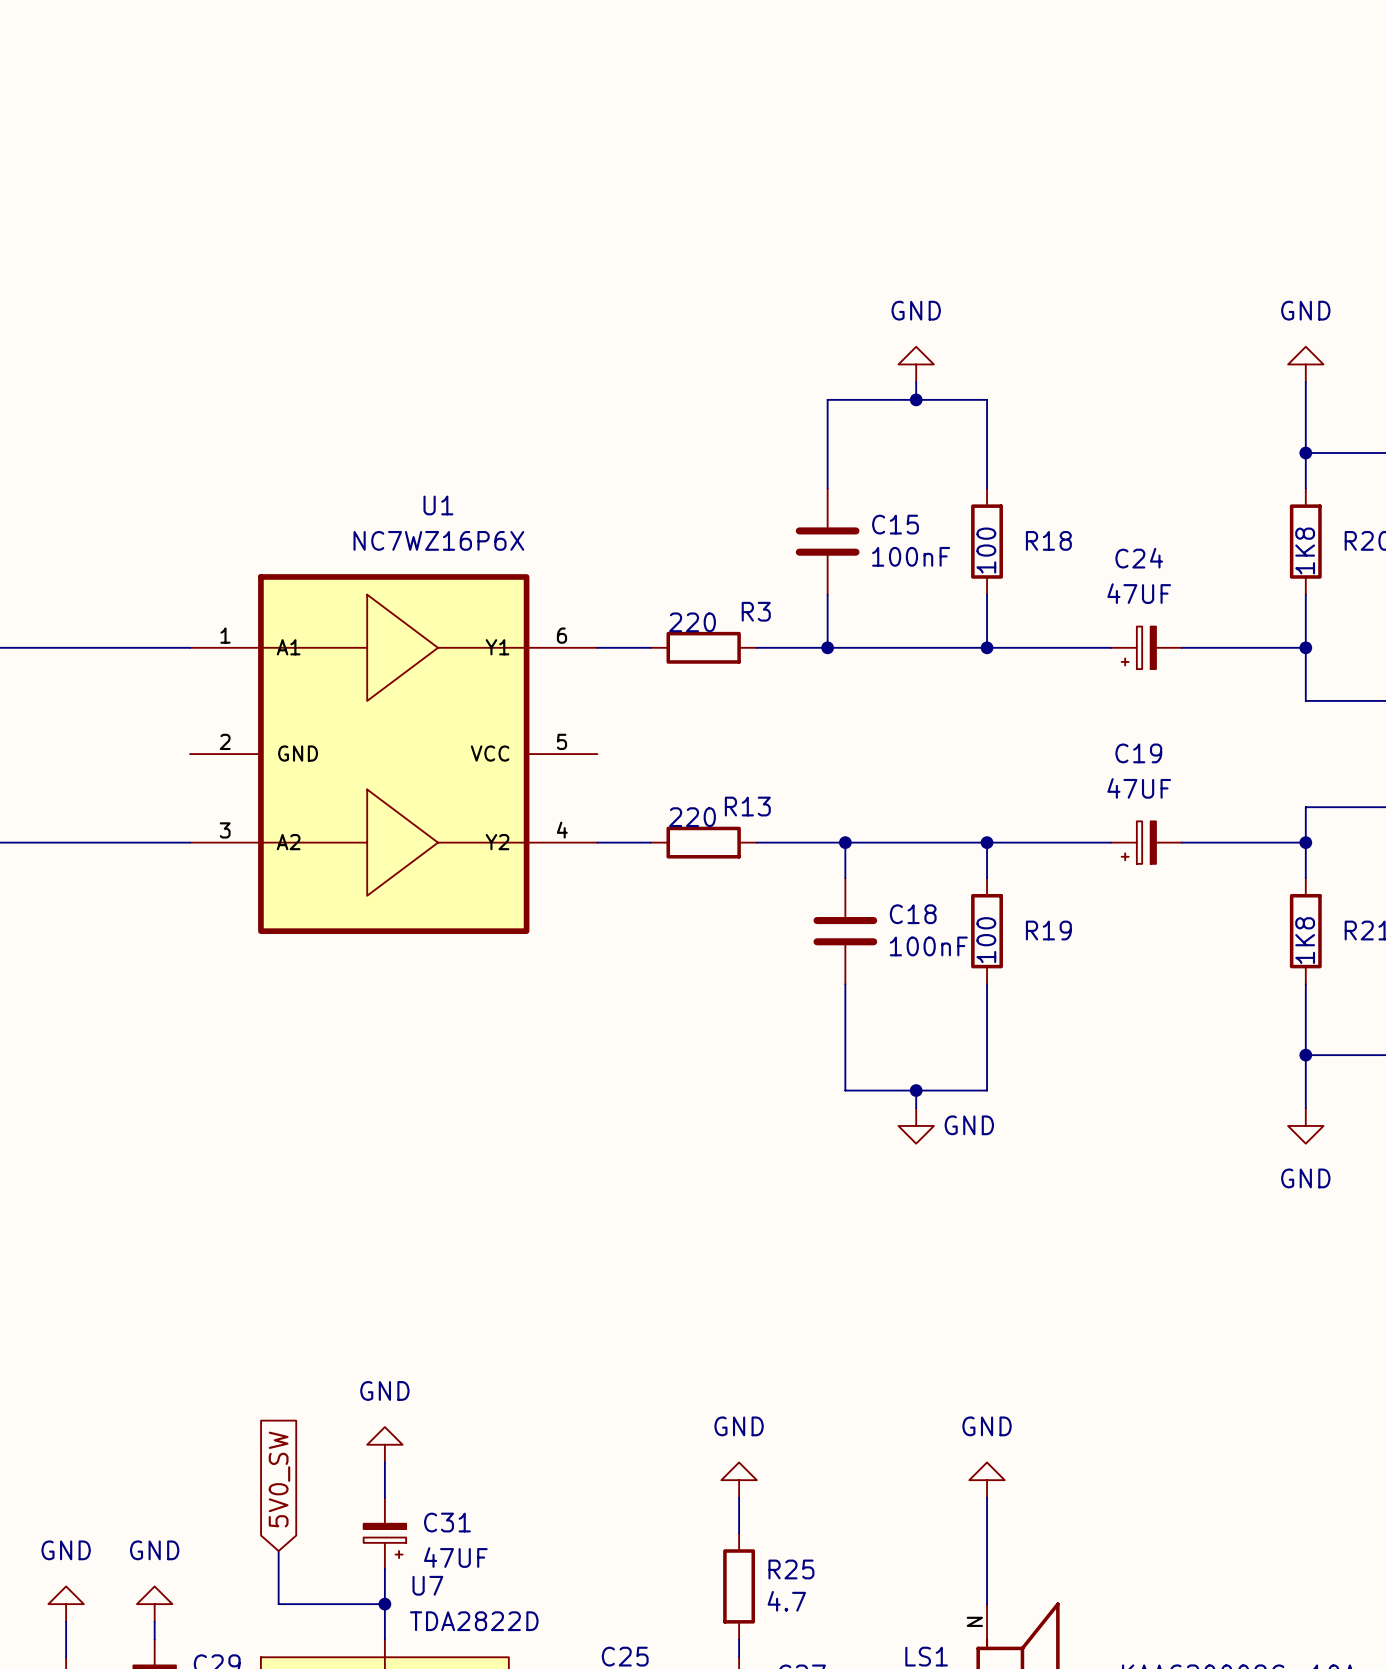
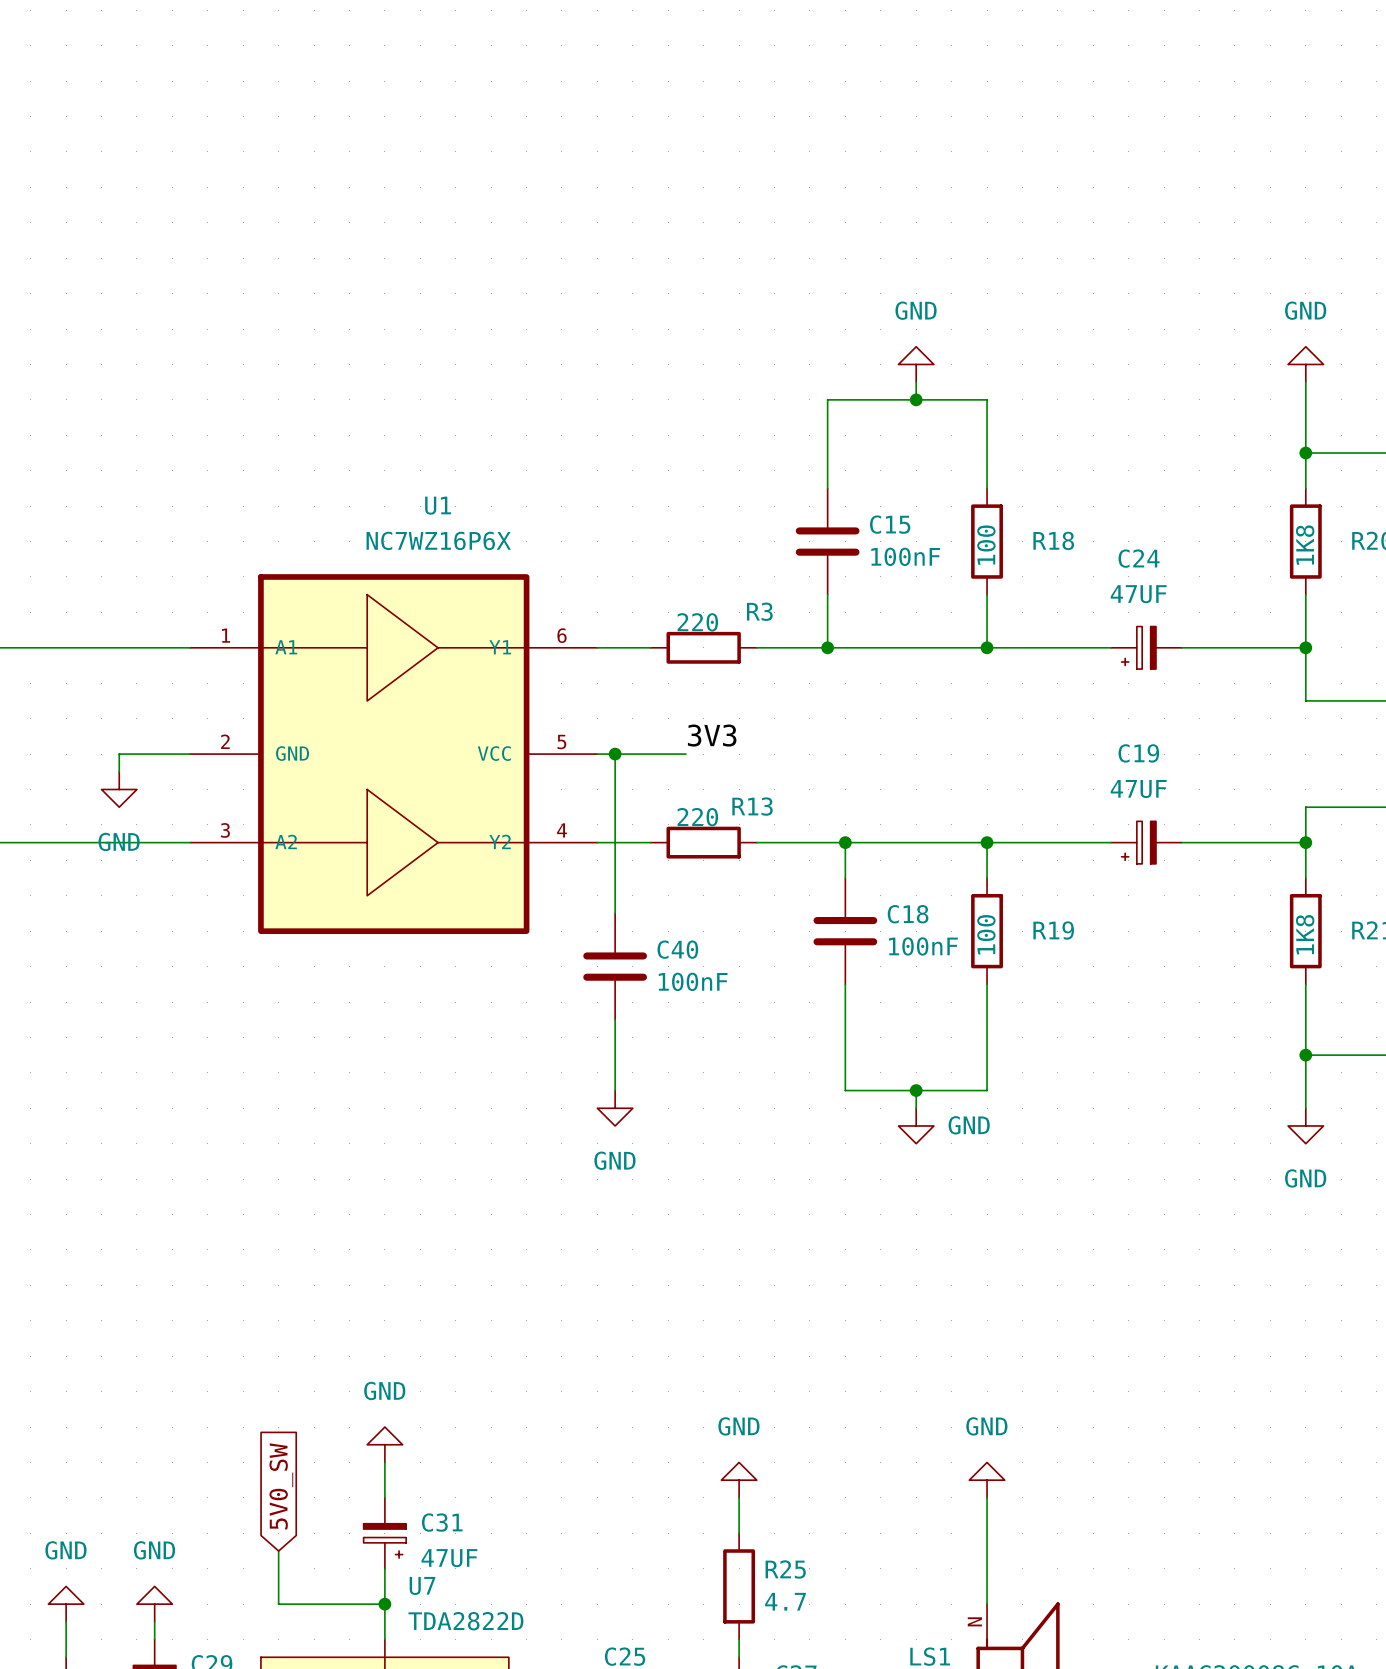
label: none -> 3V3 (712, 735)
wire: none -> (190, 754) (119, 754) (119, 771)
wire: none -> (597, 754) (685, 754)
wire: none -> (615, 754) (615, 913)
junction: none -> (615, 754)
power symbol: none -> GND (119, 789)
C40: none -> 100nF (615, 966)
wire: none -> (615, 1019) (615, 1090)
power symbol: none -> GND (615, 1108)

